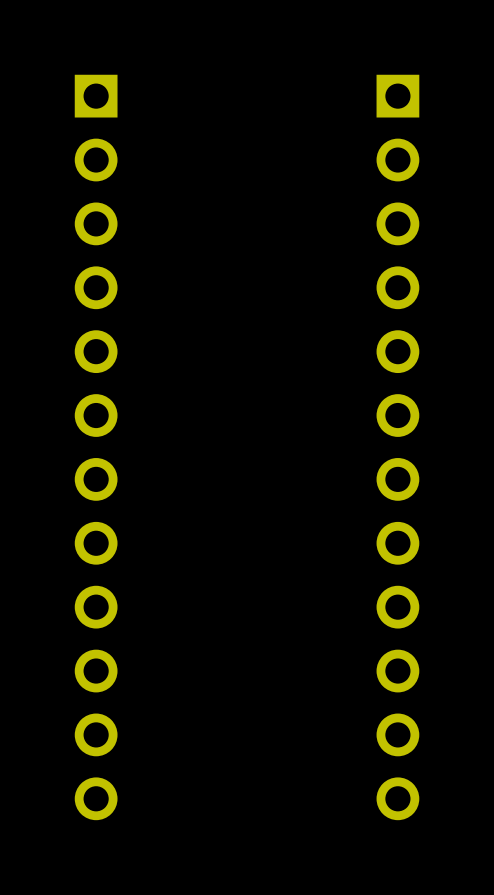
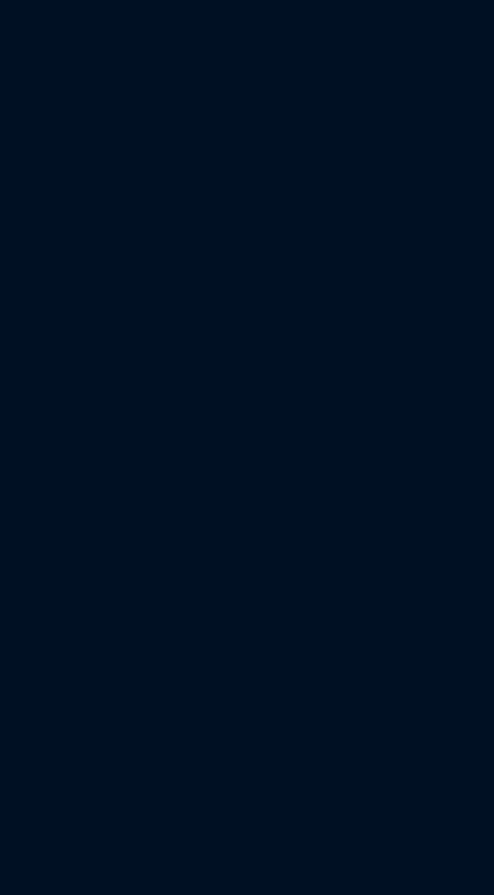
part: (96, 447) -> none
part: (397, 447) -> none

